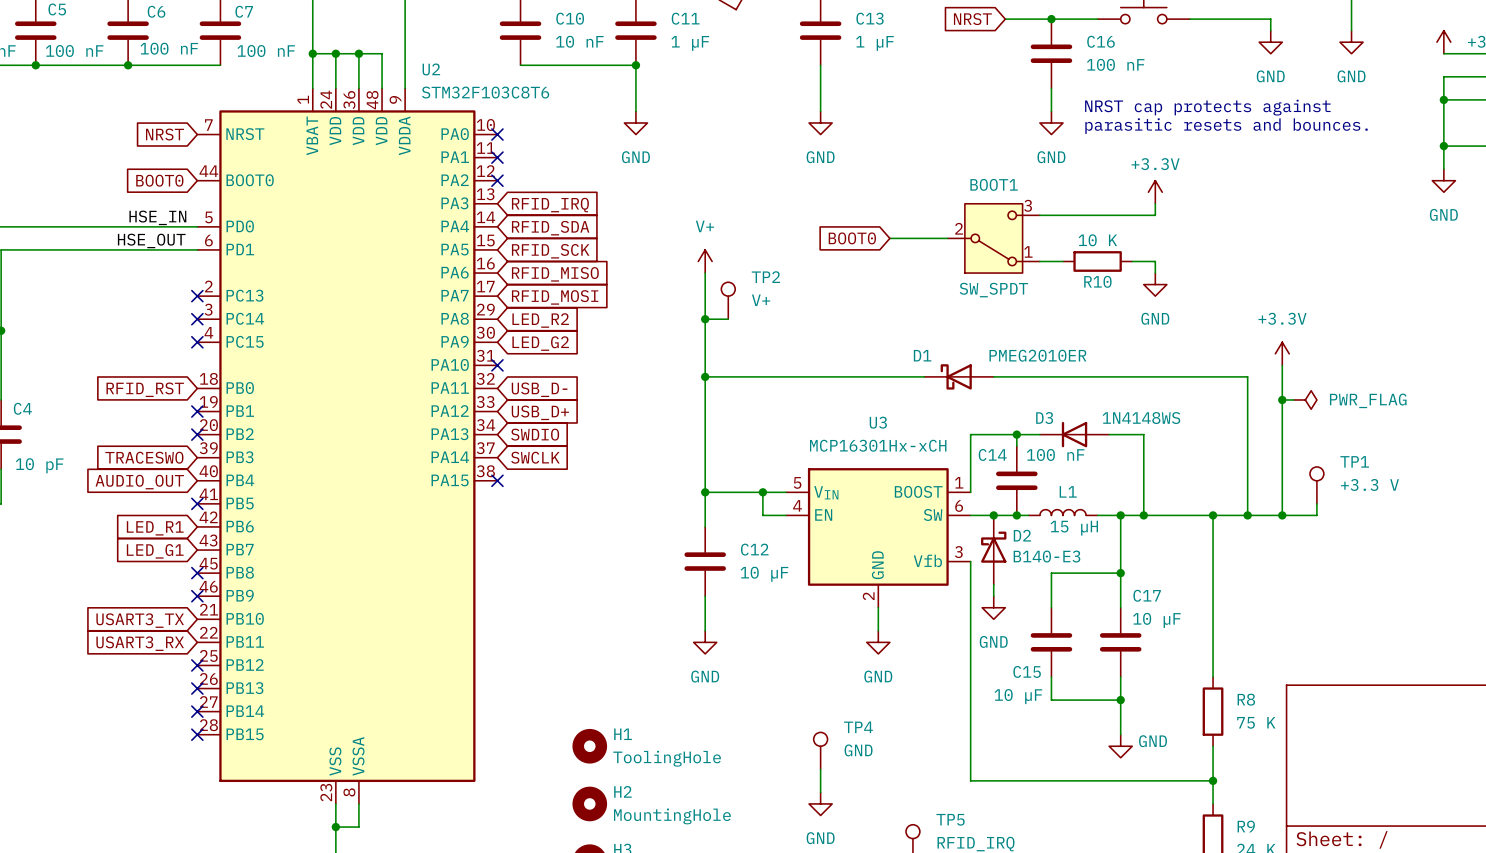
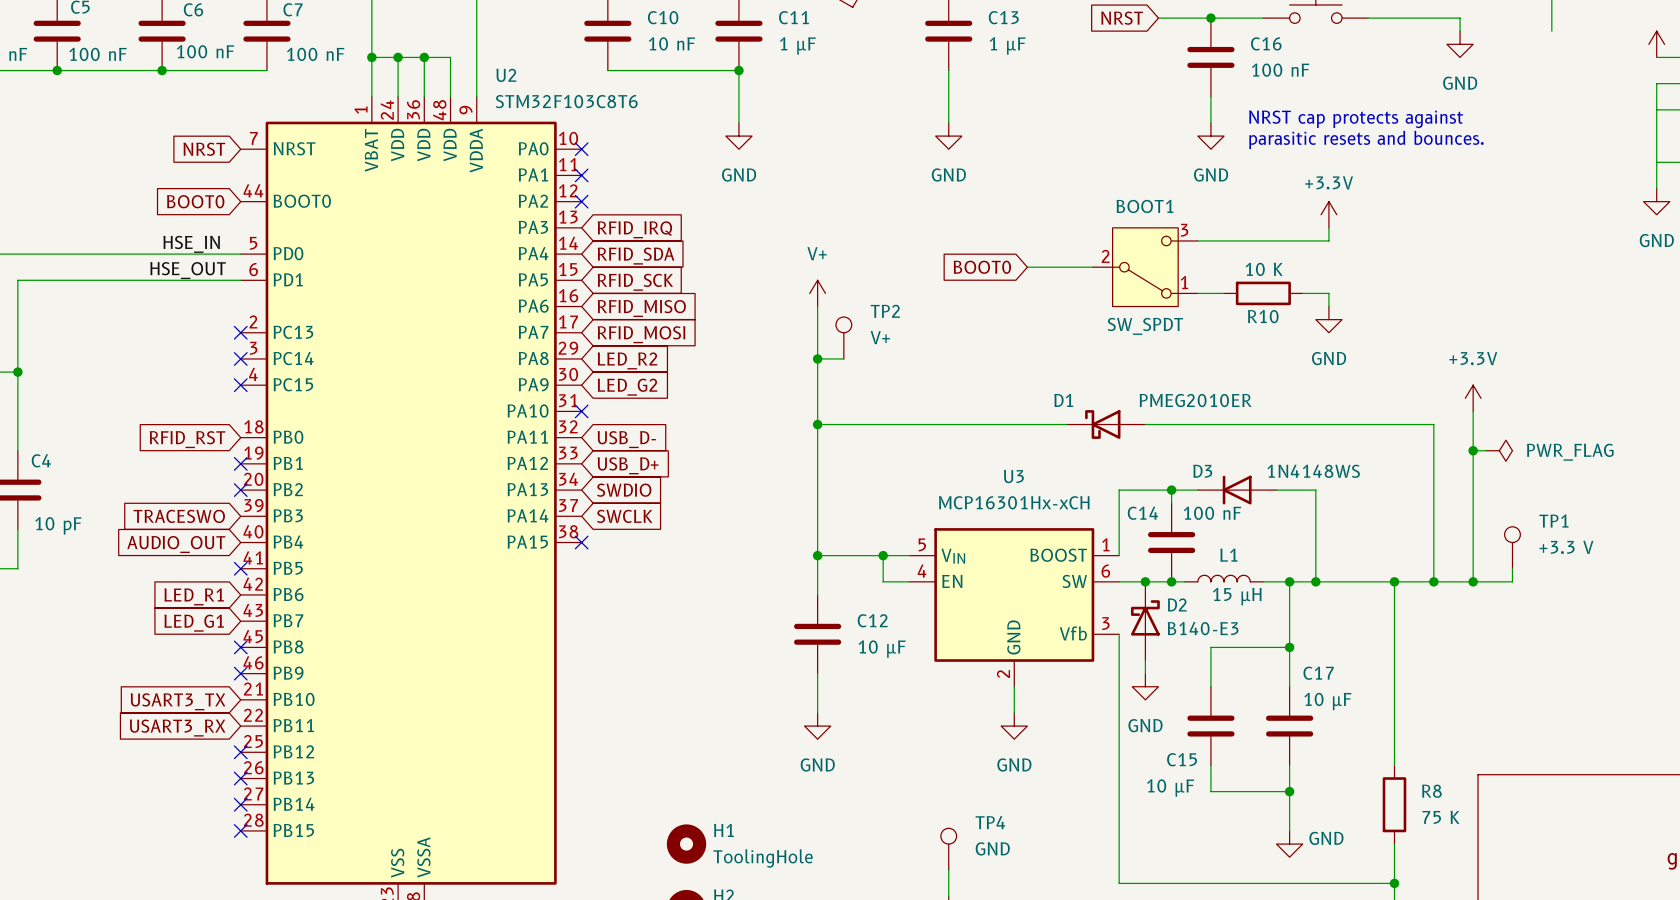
power symbol: GND (1351, 42) -> none
junction: (1443, 99) -> none
junction: (1443, 146) -> none

